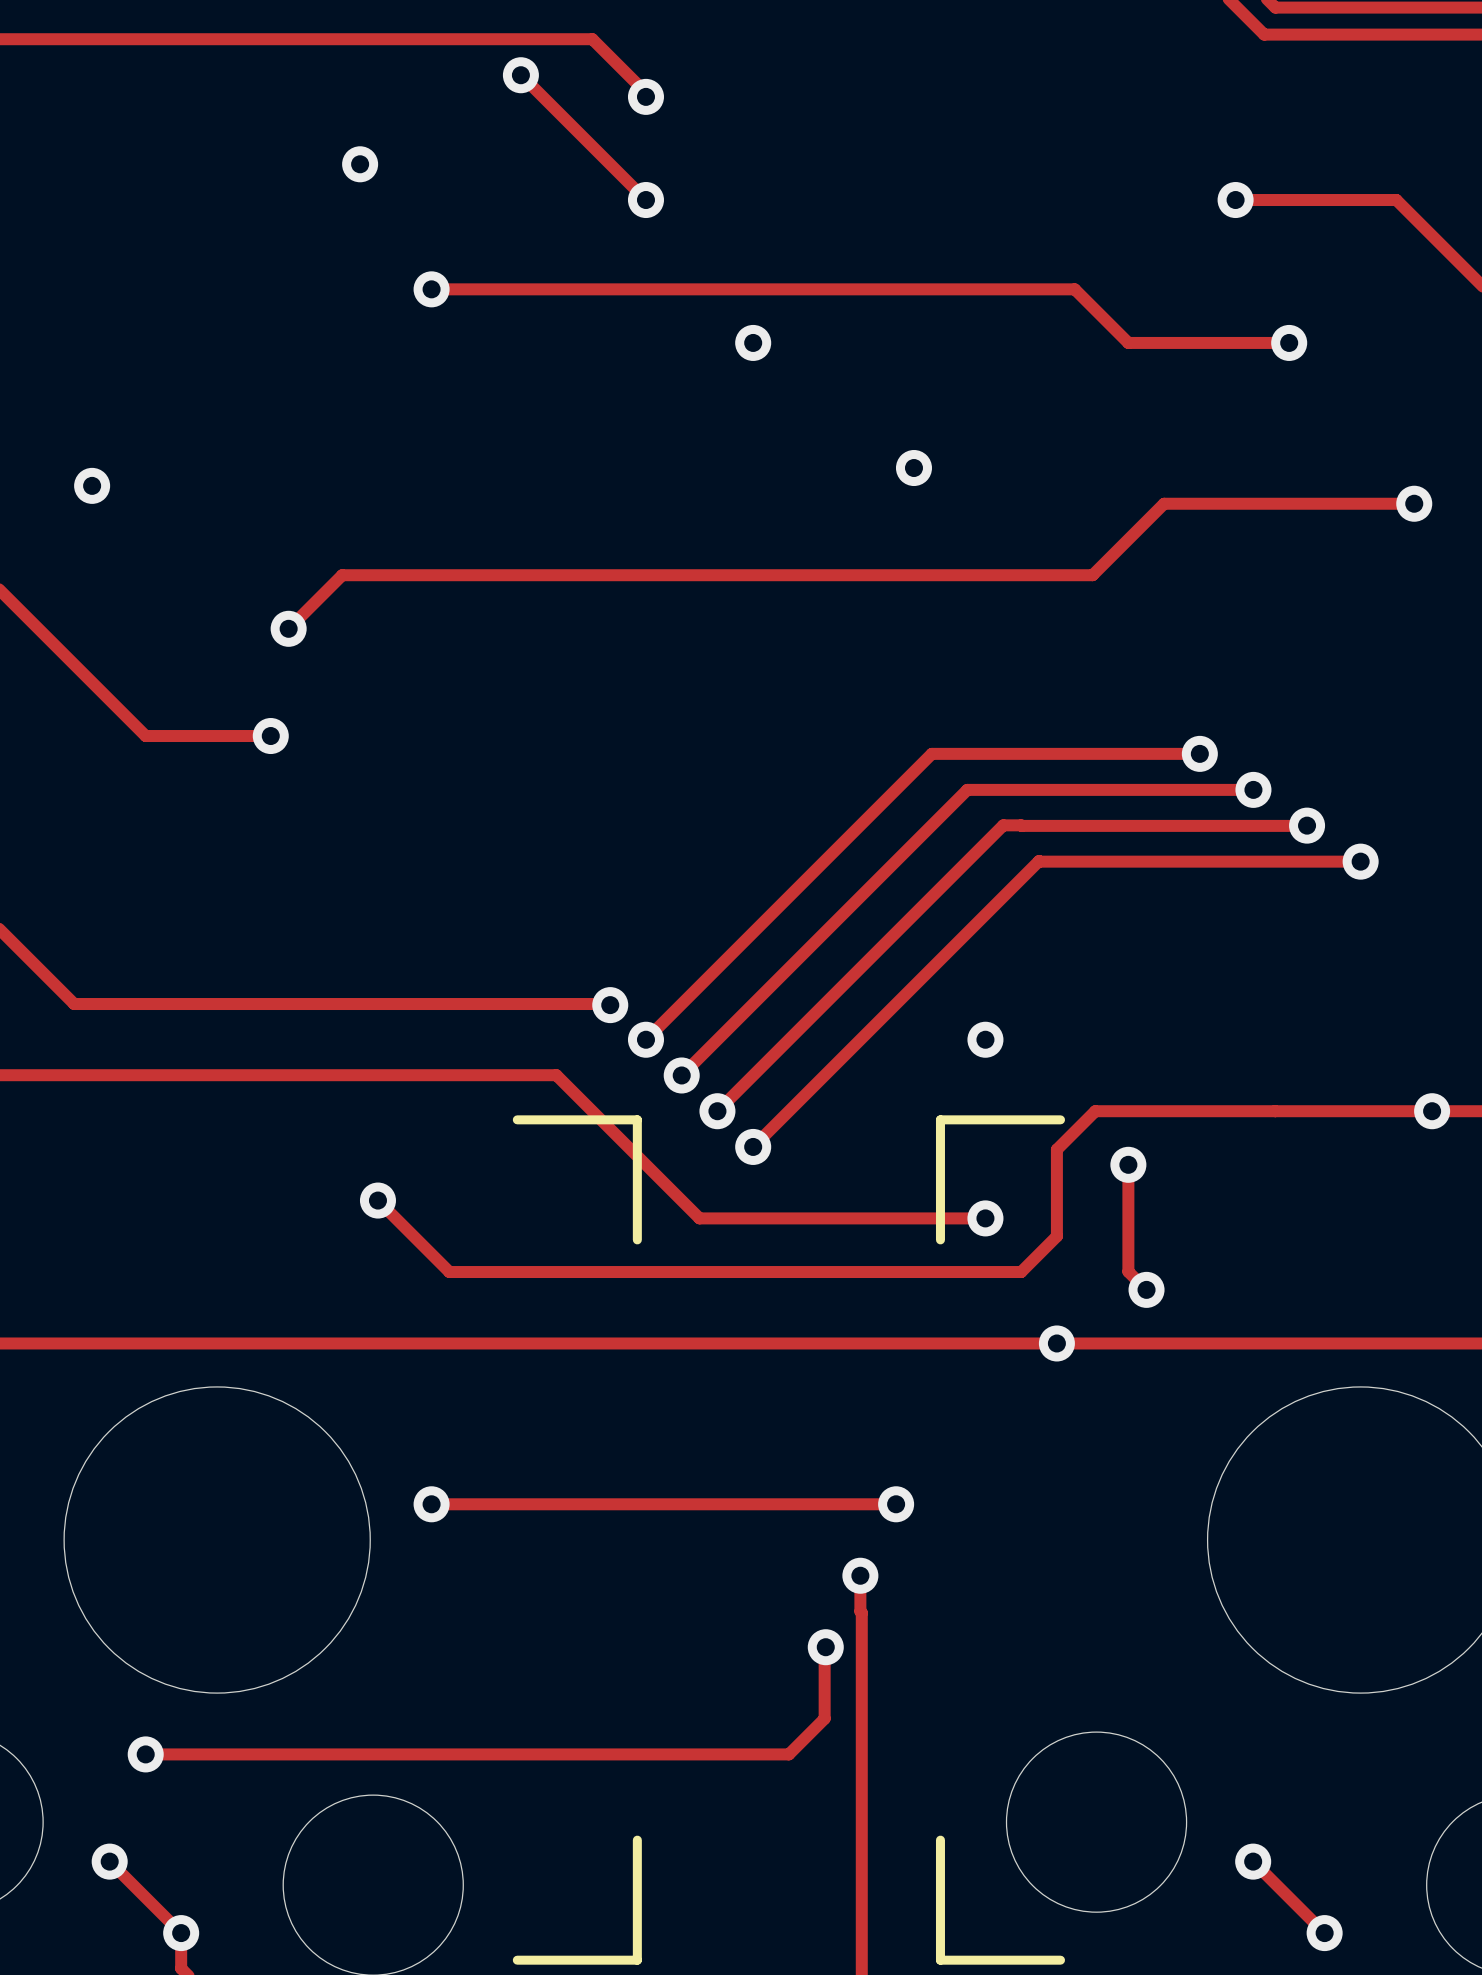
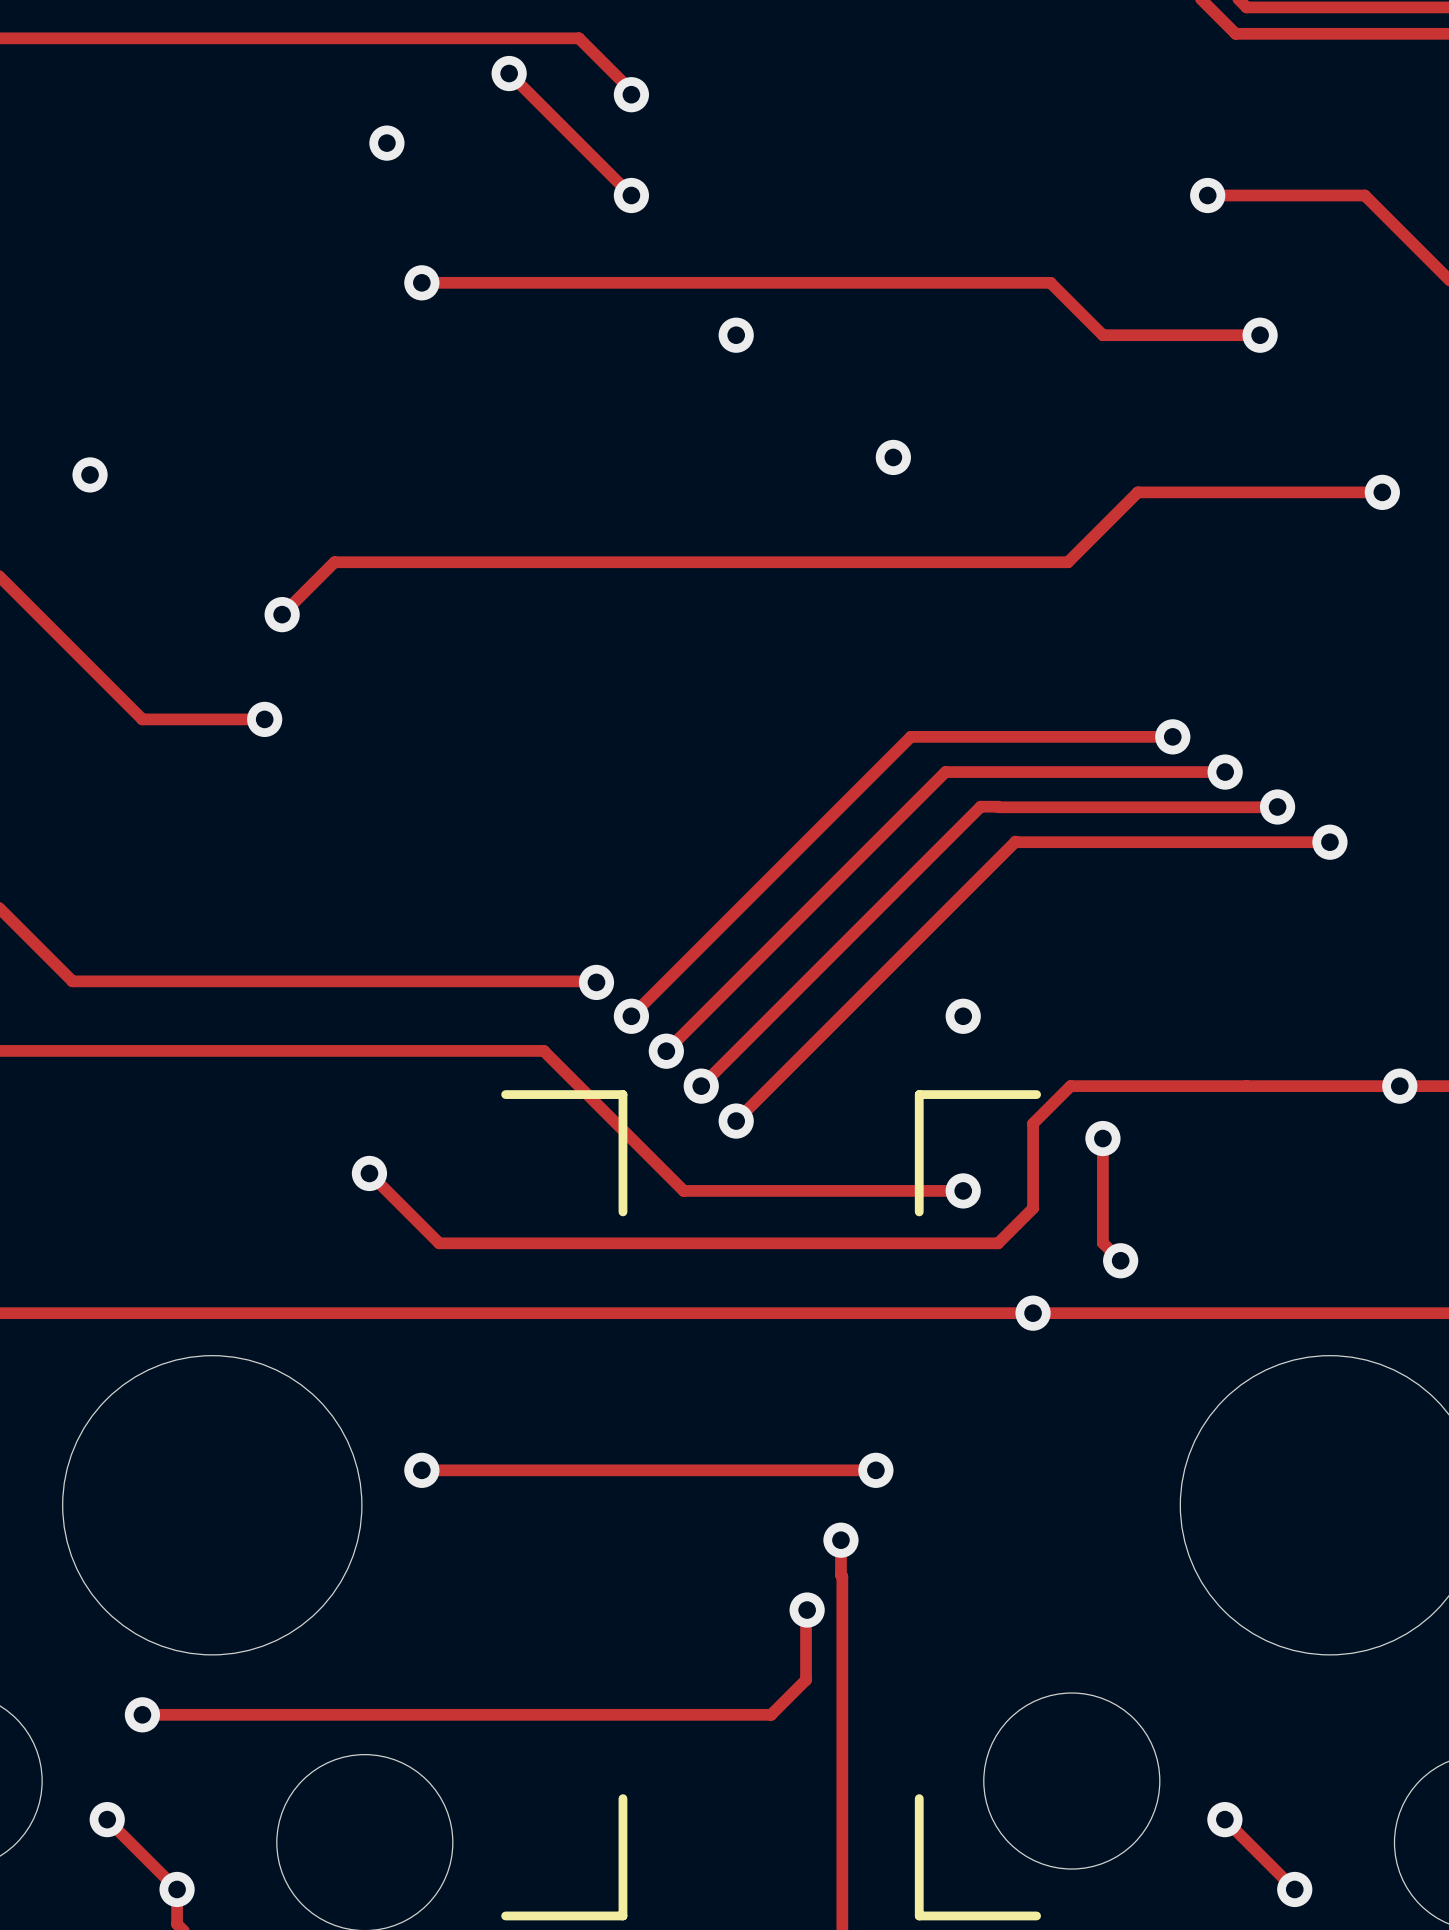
via position: (360, 164) -> (386, 143)

